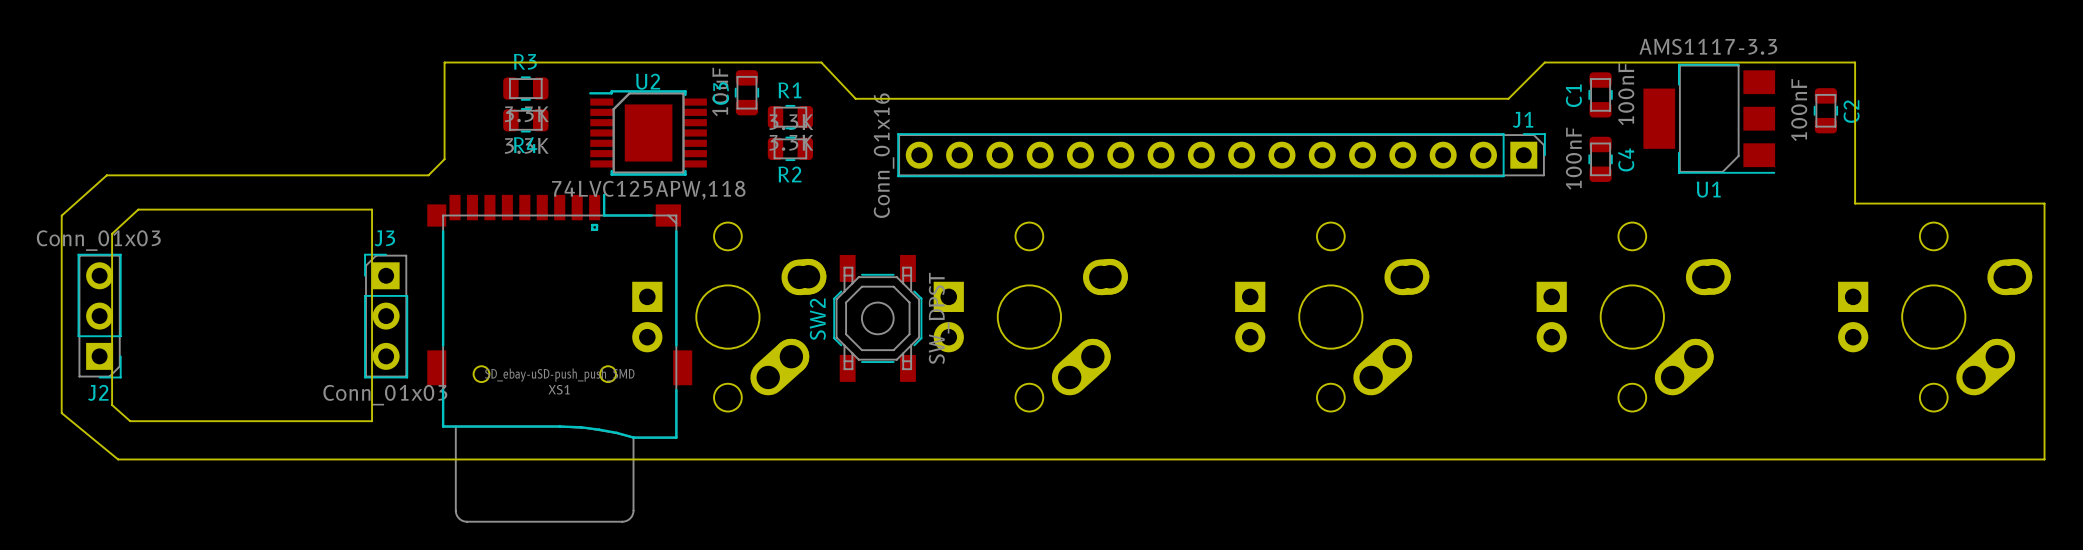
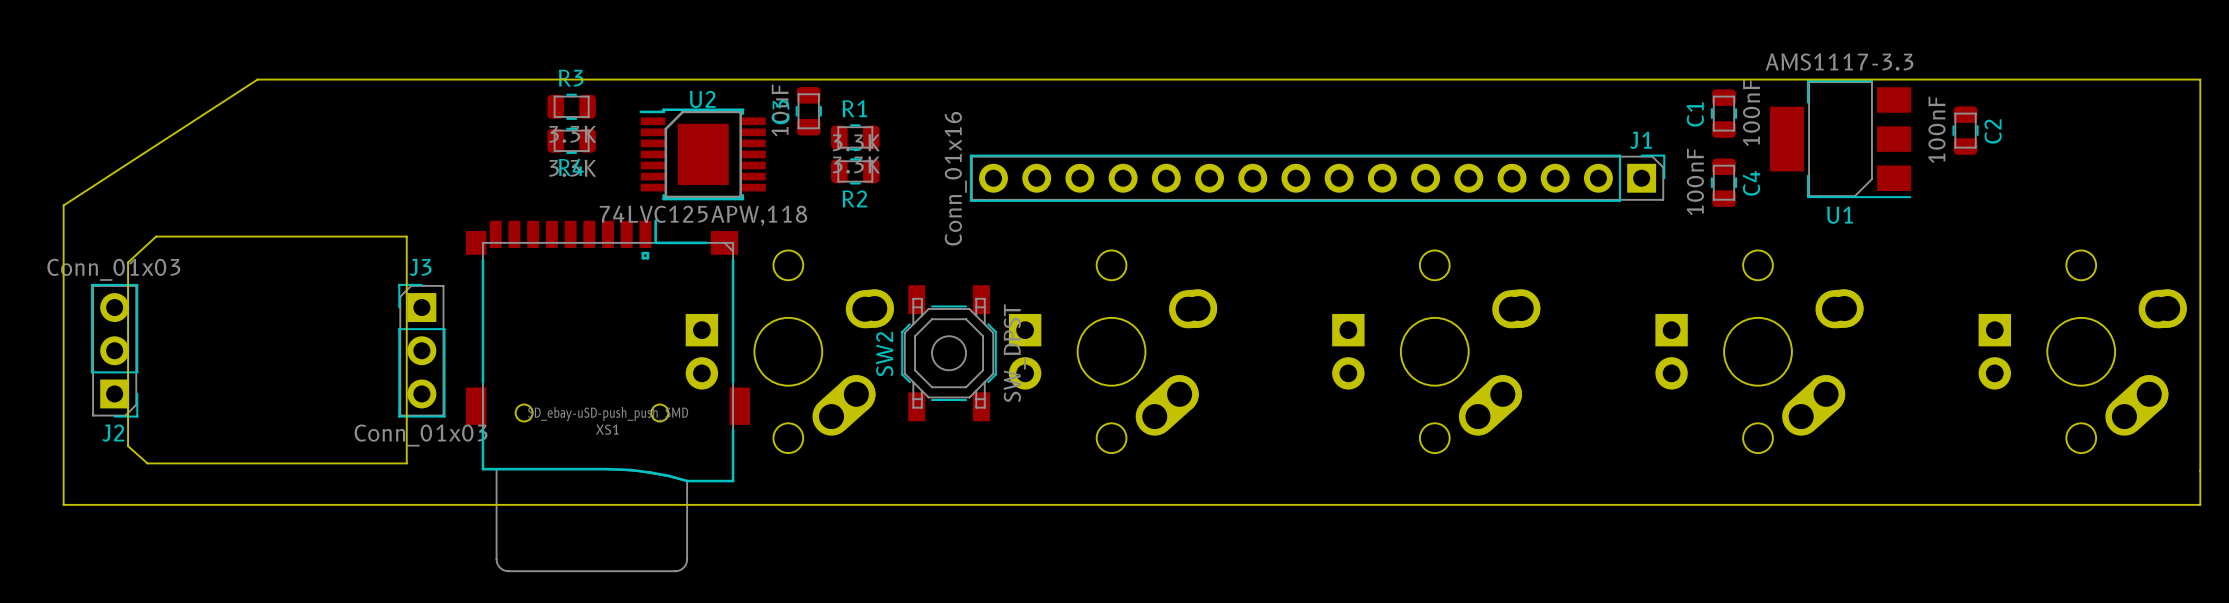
board edge: (444, 62) (821, 62) (855, 98) (1508, 98) (1544, 62) (1855, 62) (1855, 203) (2044, 203) (2044, 459) (118, 459) (61, 413) (61, 215) (106, 175) (428, 175) (444, 159) (444, 62) -> (257, 79) (63, 205) (63, 504) (2200, 504) (2200, 79) (257, 79)

